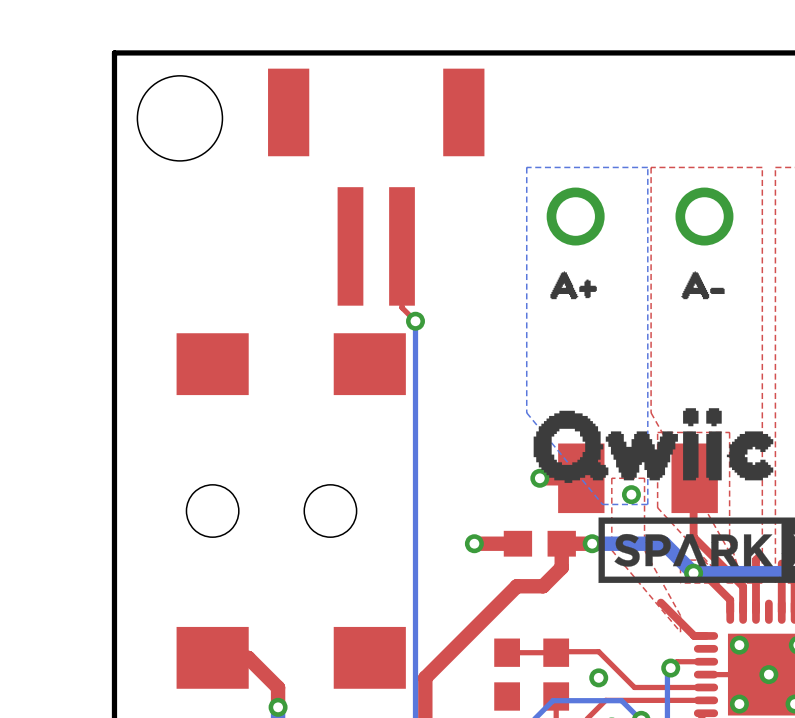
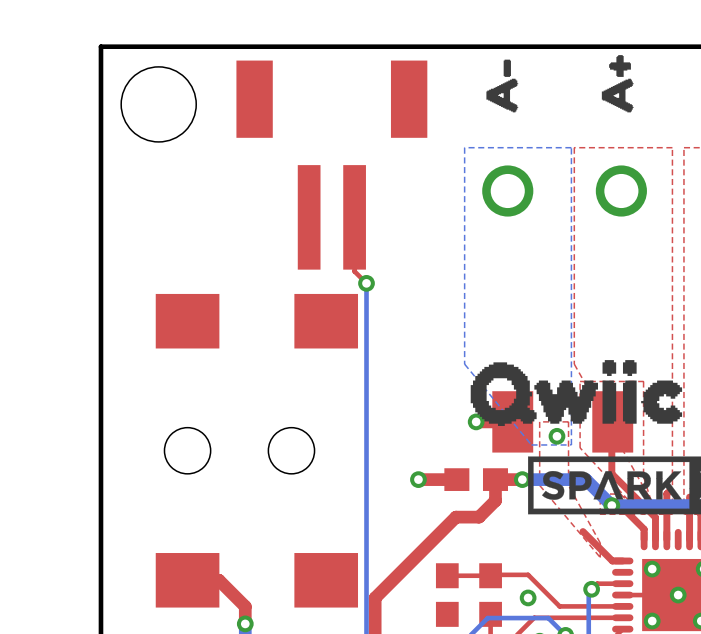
drawing: none -> [601, 55, 634, 113]
drawing: none -> [486, 59, 519, 113]
drawing: [550, 271, 597, 300] -> none
drawing: [681, 271, 725, 300] -> none

